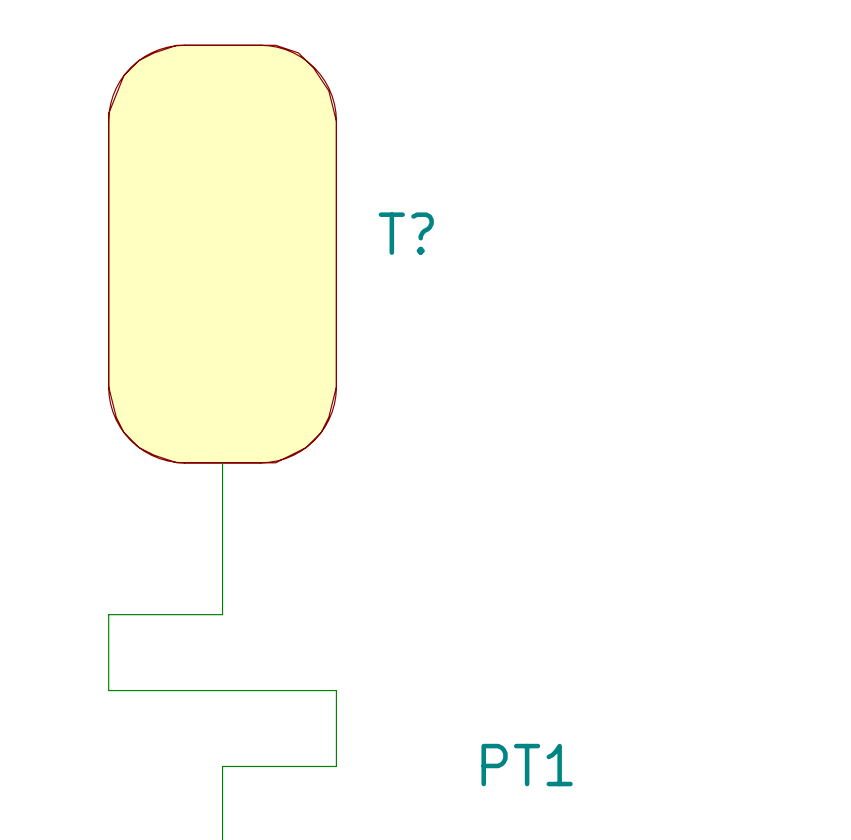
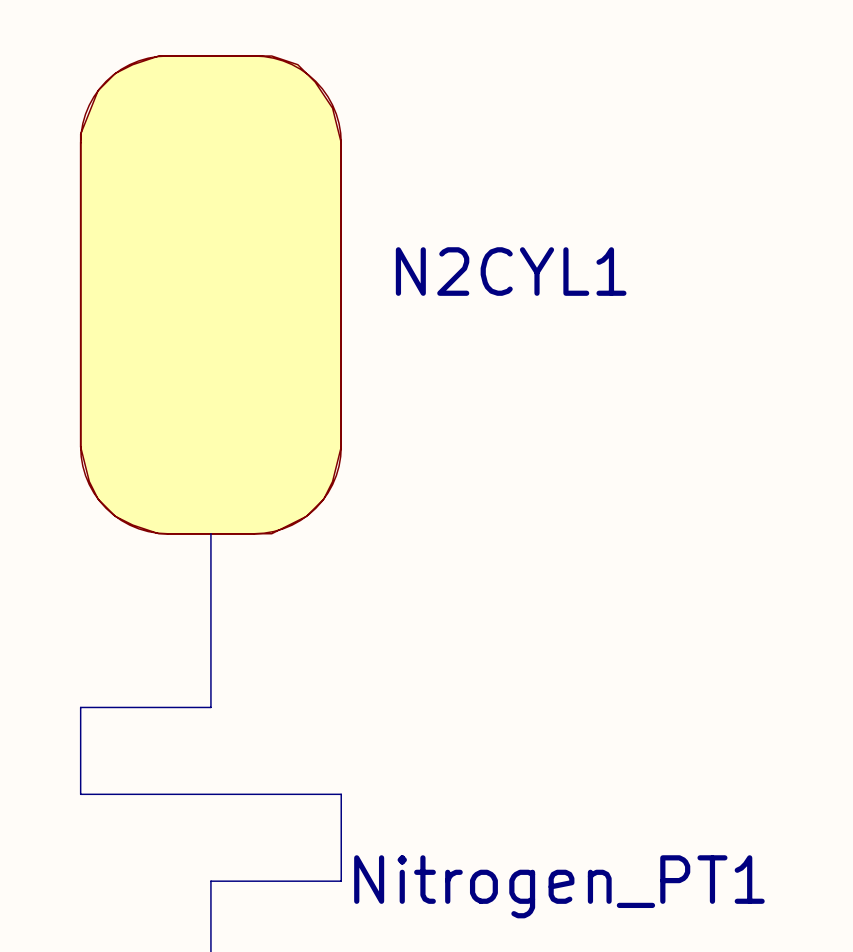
T? name: T? (406, 233) -> N2CYL1 (511, 271)
PT1 name: PT1 (527, 765) -> Nitrogen_PT1 (559, 886)

